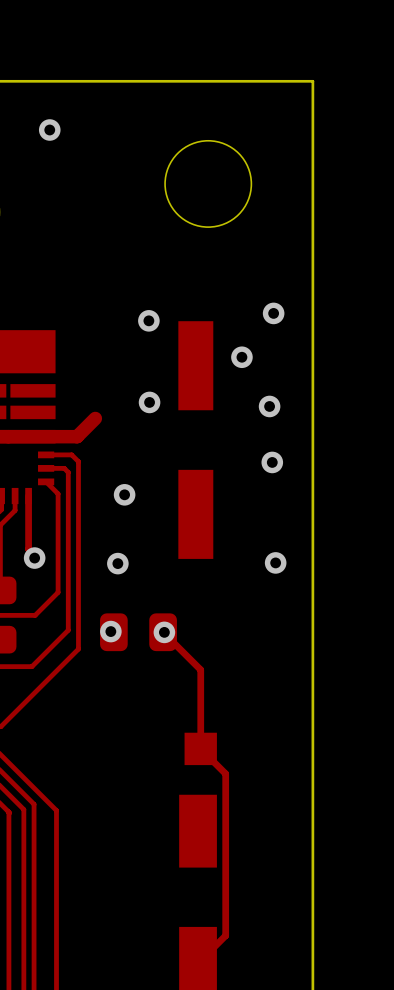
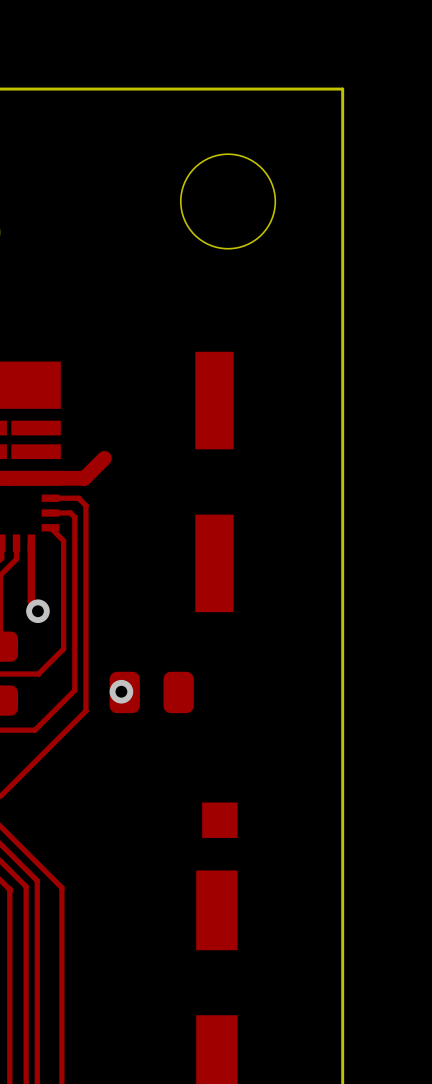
via: (49, 130) -> none
via: (273, 313) -> none
via: (148, 320) -> none
via: (241, 357) -> none
via: (149, 402) -> none
via: (269, 406) -> none
via: (272, 462) -> none
via: (124, 494) -> none
via: (275, 562) -> none
via: (117, 563) -> none
top track: (163, 632) (200, 669) (200, 748) (225, 773) (225, 935) (198, 963) -> none
via: (164, 632) -> none

